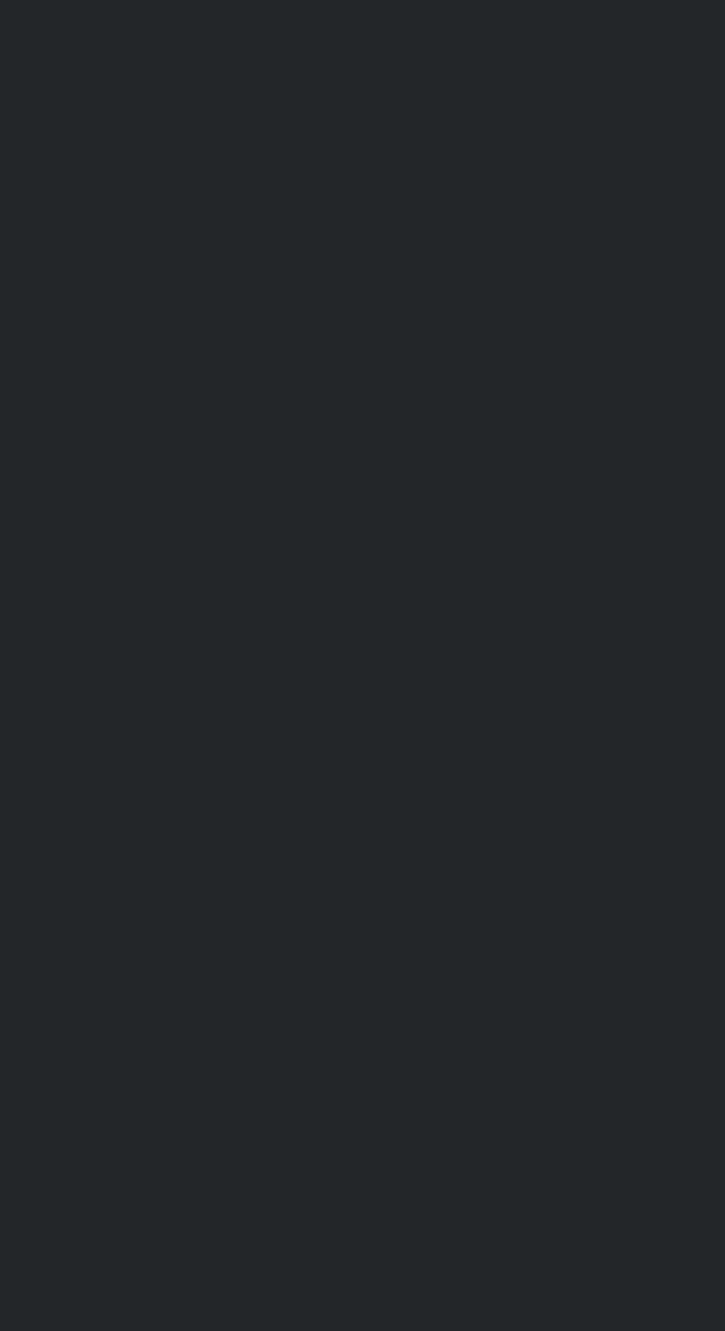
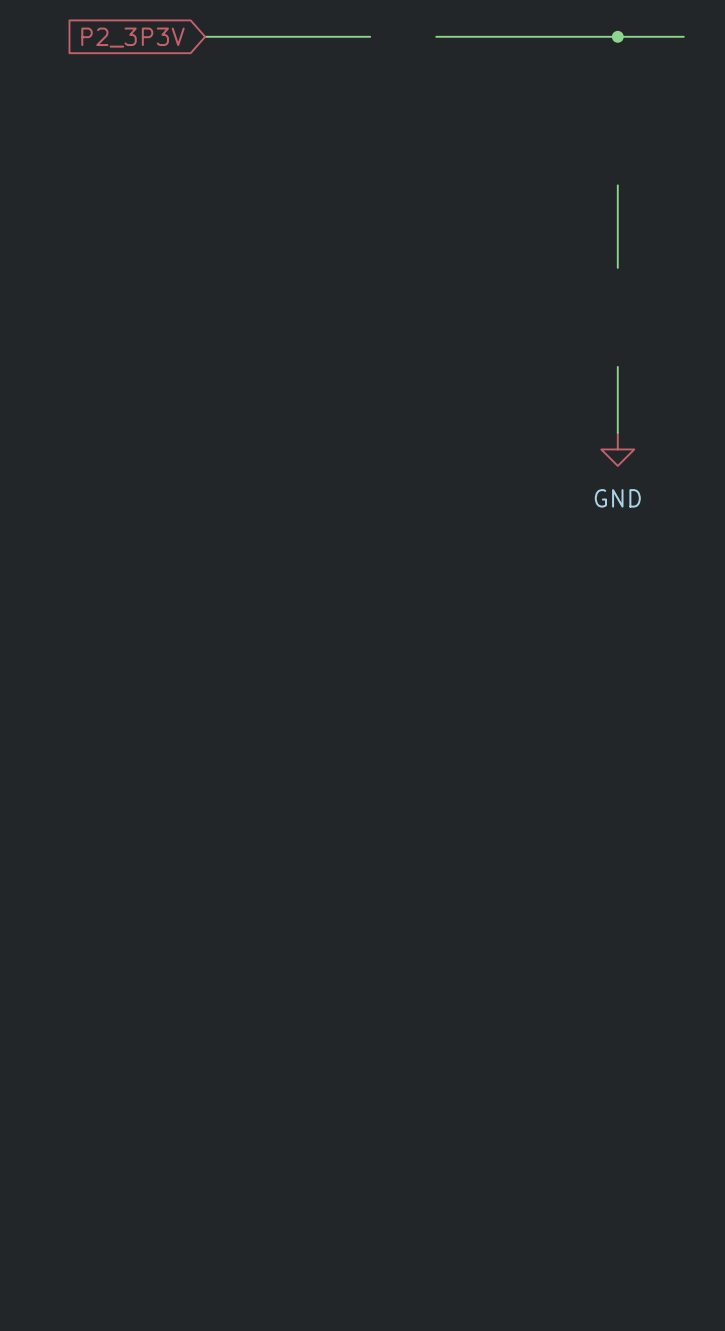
wire: none -> (205, 36) (370, 36)
wire: none -> (436, 36) (683, 36)
junction: none -> (617, 36)
global label: none -> P2_3P3V (133, 37)
wire: none -> (617, 185) (617, 267)
wire: none -> (617, 366) (617, 432)
power symbol: none -> GND (617, 449)

